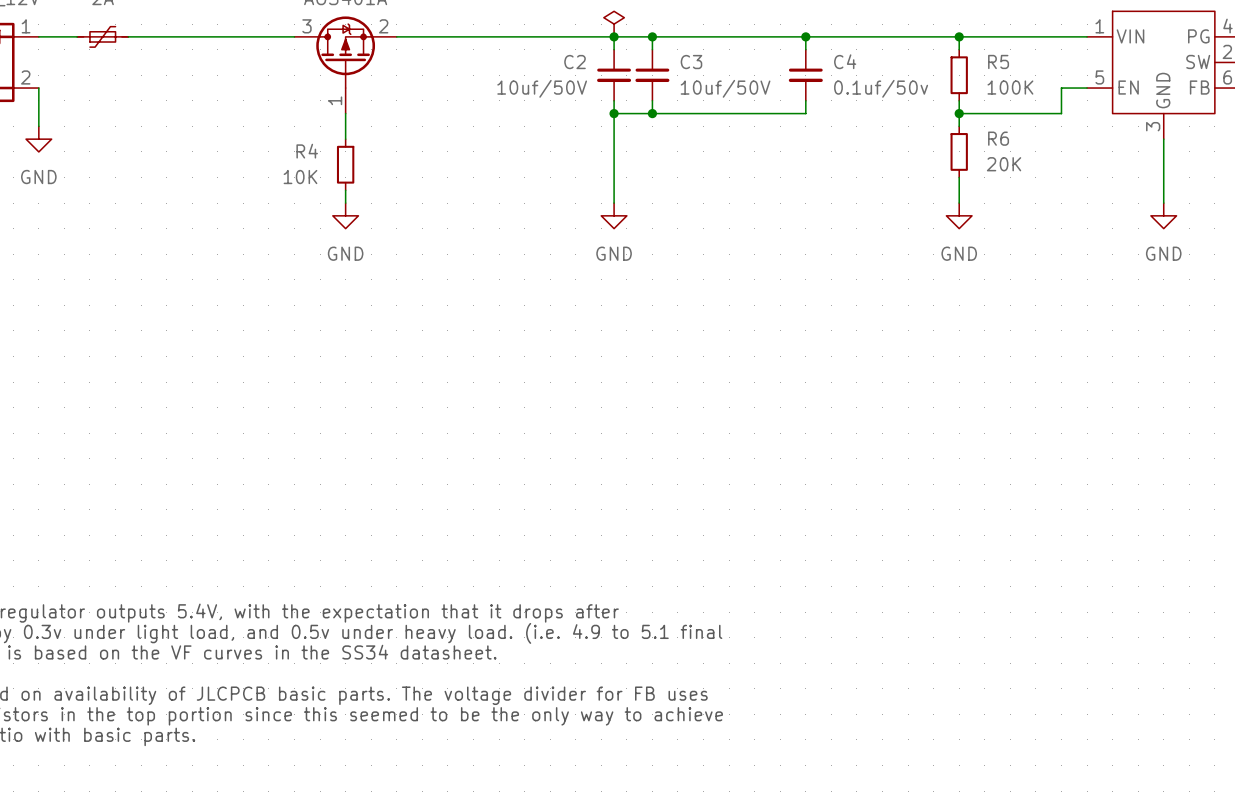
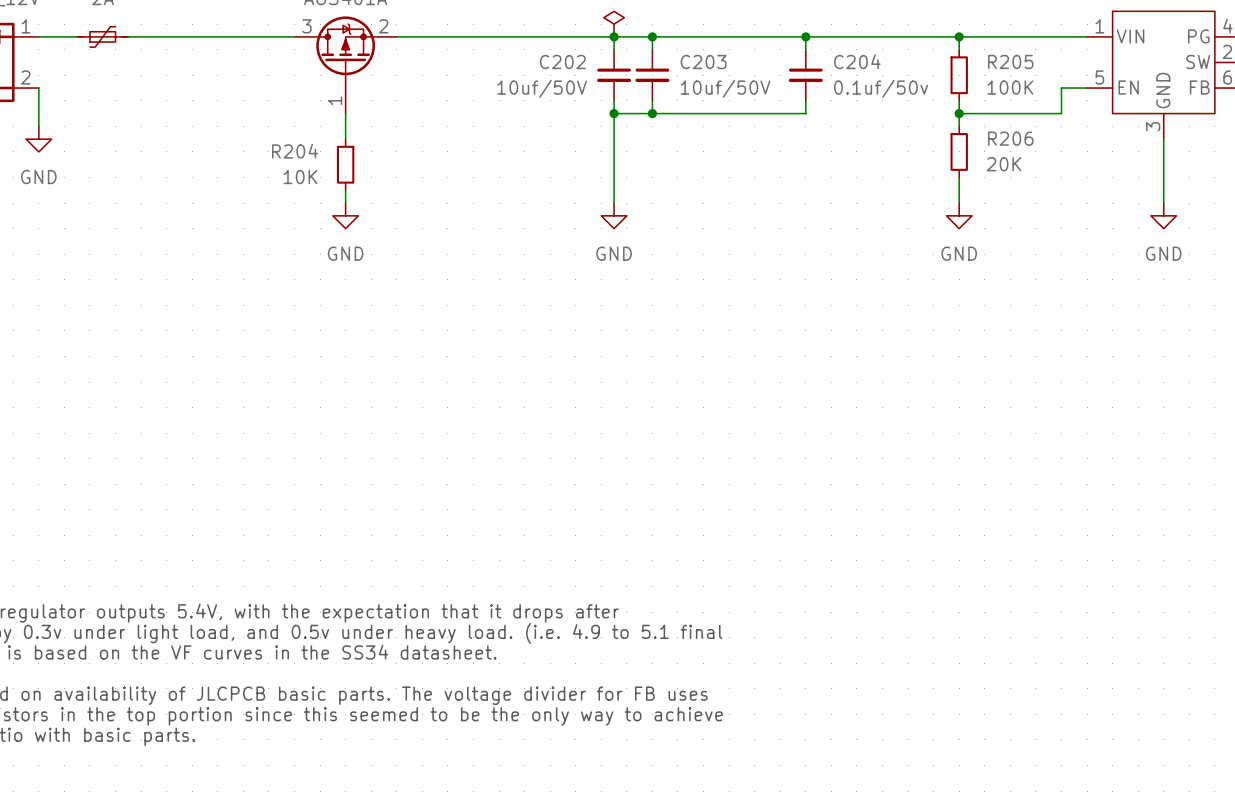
C4 name: C4 (845, 61) -> C204 (857, 61)
R5 name: R5 (998, 61) -> R205 (1010, 61)
C2 name: C2 (575, 62) -> C202 (562, 62)
C3 name: C3 (691, 62) -> C203 (703, 62)
R6 name: R6 (998, 138) -> R206 (1010, 138)
R4 name: R4 (307, 151) -> R204 (295, 151)

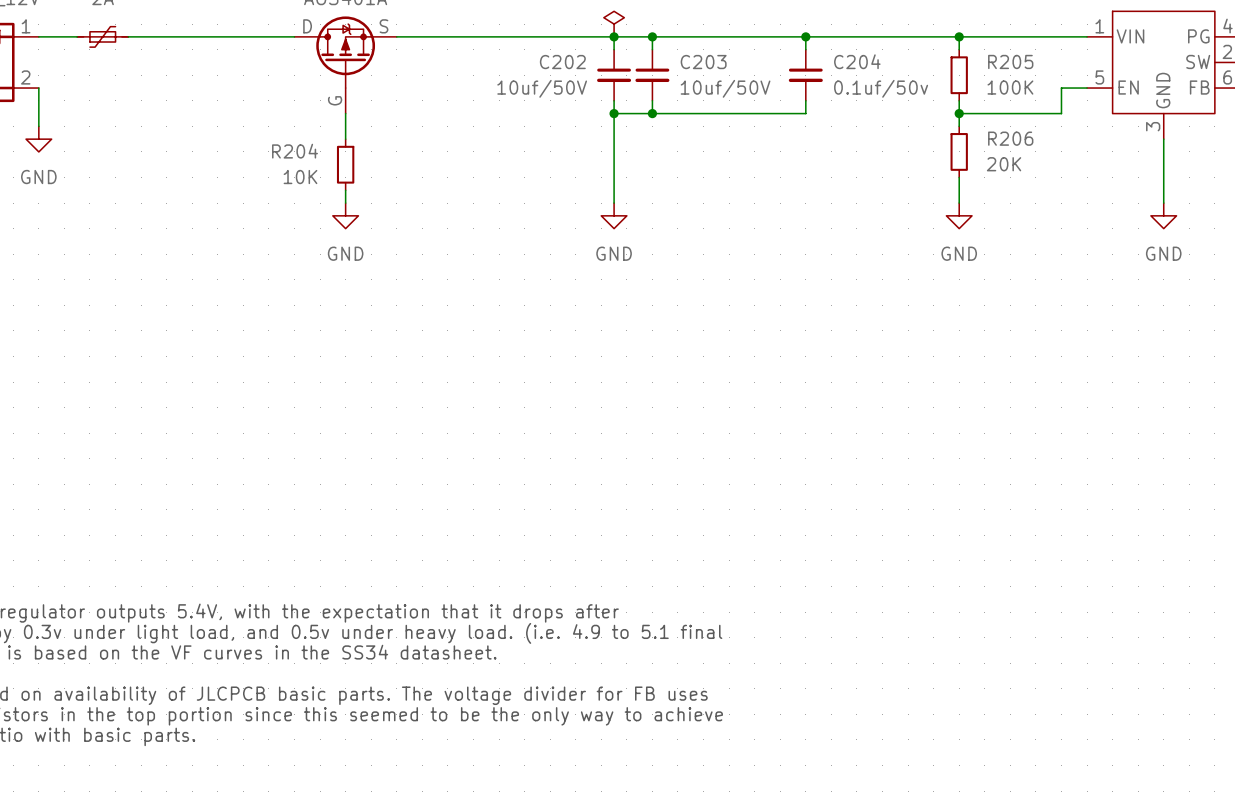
part pin number: 3 (306, 26) -> none
part pin name: none -> D (307, 26)
part pin name: none -> S (383, 26)
part pin number: 2 (383, 26) -> none
part pin name: none -> G (335, 100)
part pin number: 1 (335, 100) -> none

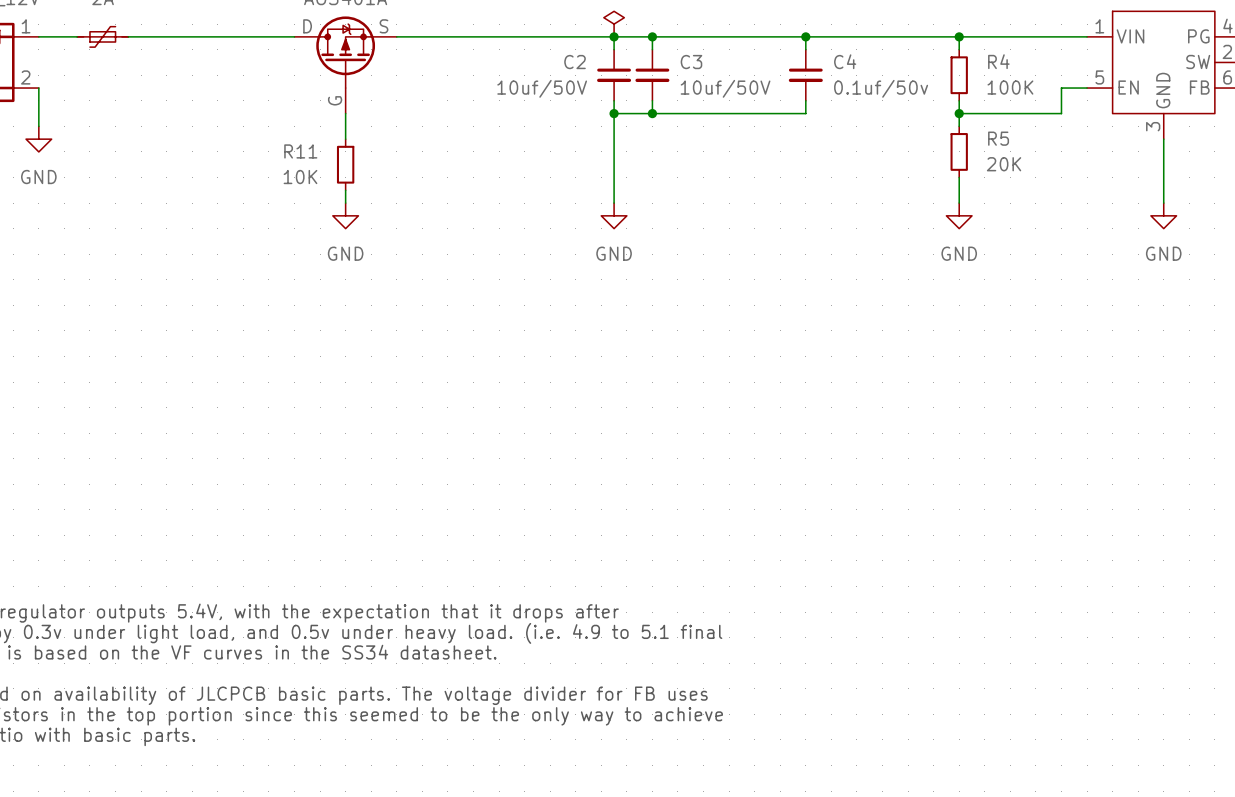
C204 name: C204 (857, 61) -> C4 (845, 61)
R205 name: R205 (1010, 61) -> R4 (998, 61)
C202 name: C202 (562, 62) -> C2 (575, 62)
C203 name: C203 (703, 62) -> C3 (691, 62)
R206 name: R206 (1010, 138) -> R5 (998, 138)
R204 name: R204 (295, 151) -> R11 (300, 151)

